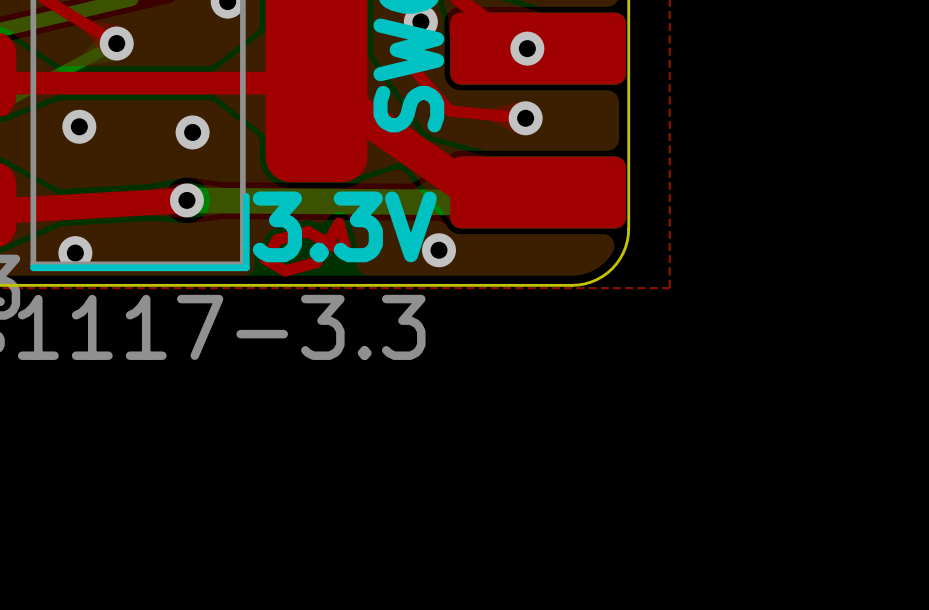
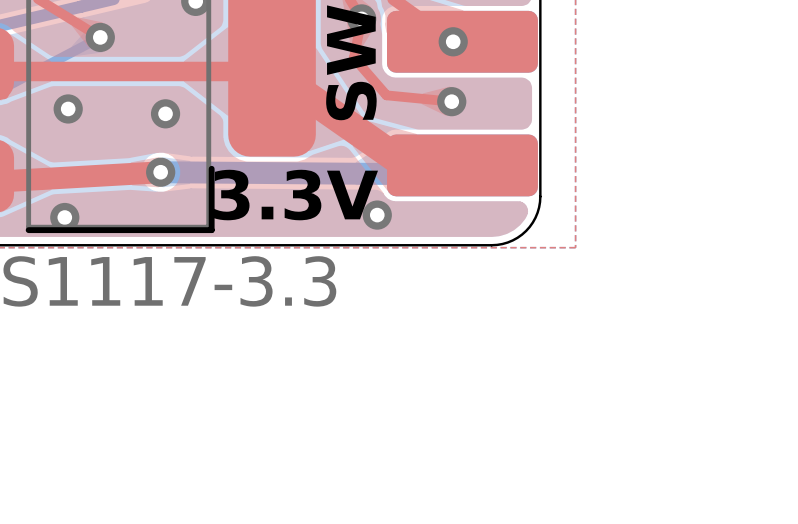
top track: (338, 223) (316, 262) (285, 270) (265, 259) (277, 239) (308, 231) (347, 254) (338, 223) -> none

